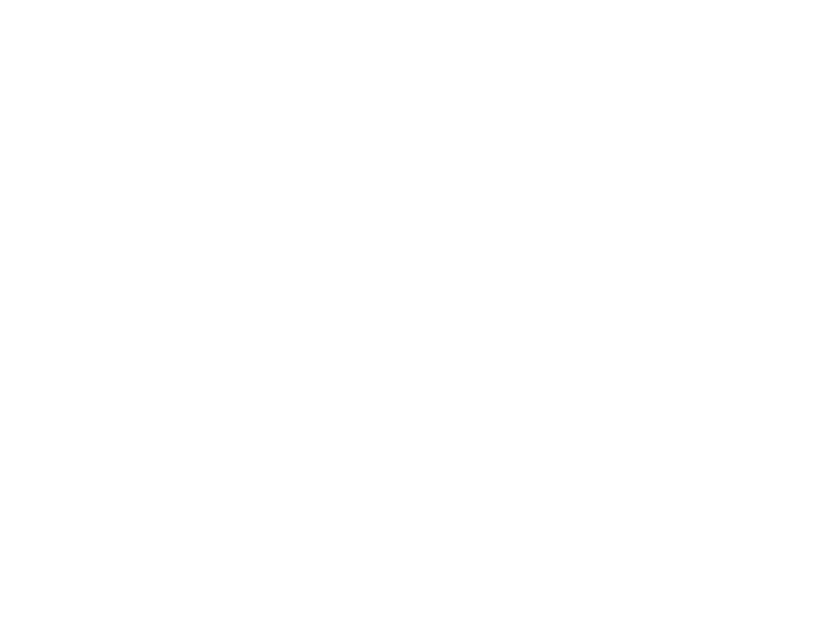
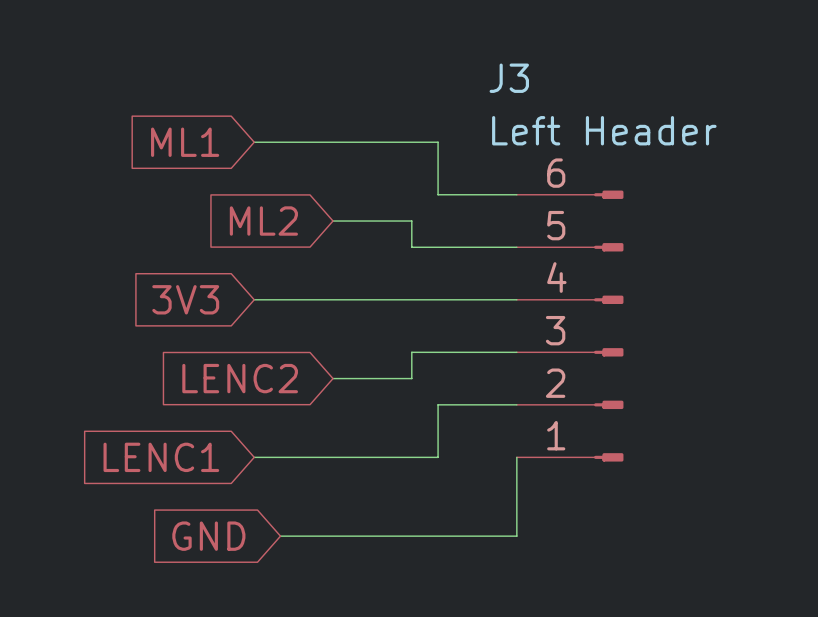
global label: none -> ML1 (185, 142)
wire: none -> (254, 142) (438, 142) (438, 194) (516, 194)
global label: none -> ML2 (263, 221)
wire: none -> (333, 221) (411, 221) (411, 247) (516, 247)
global label: none -> 3V3 (185, 299)
wire: none -> (254, 299) (516, 299)
J3: none -> Left Header (570, 326)
wire: none -> (516, 352) (411, 352) (411, 378) (333, 378)
global label: none -> LENC2 (240, 378)
wire: none -> (516, 404) (438, 404) (438, 457) (254, 457)
global label: none -> LENC1 (161, 457)
wire: none -> (516, 457) (516, 536) (280, 536)
global label: none -> GND (208, 536)

